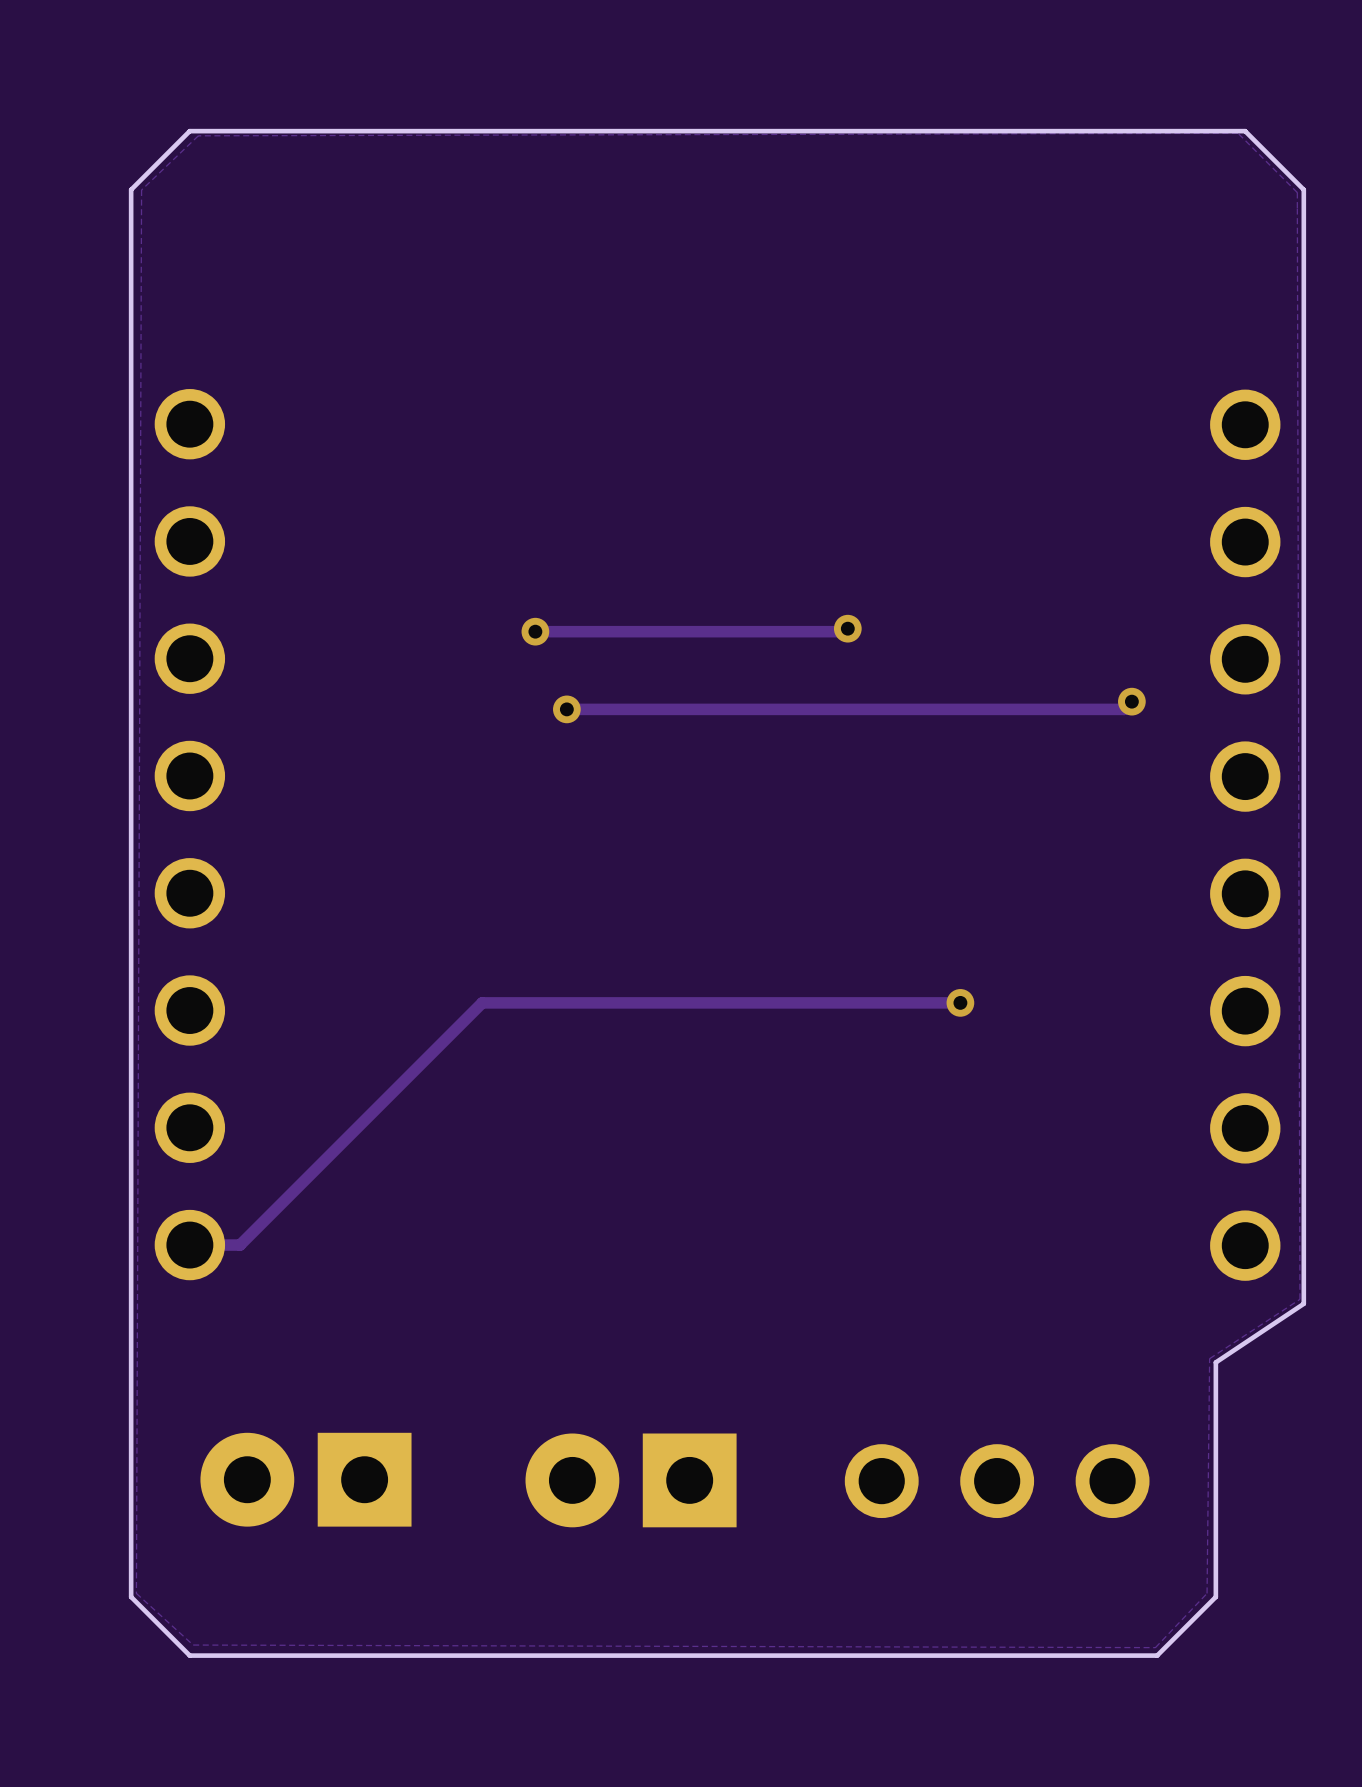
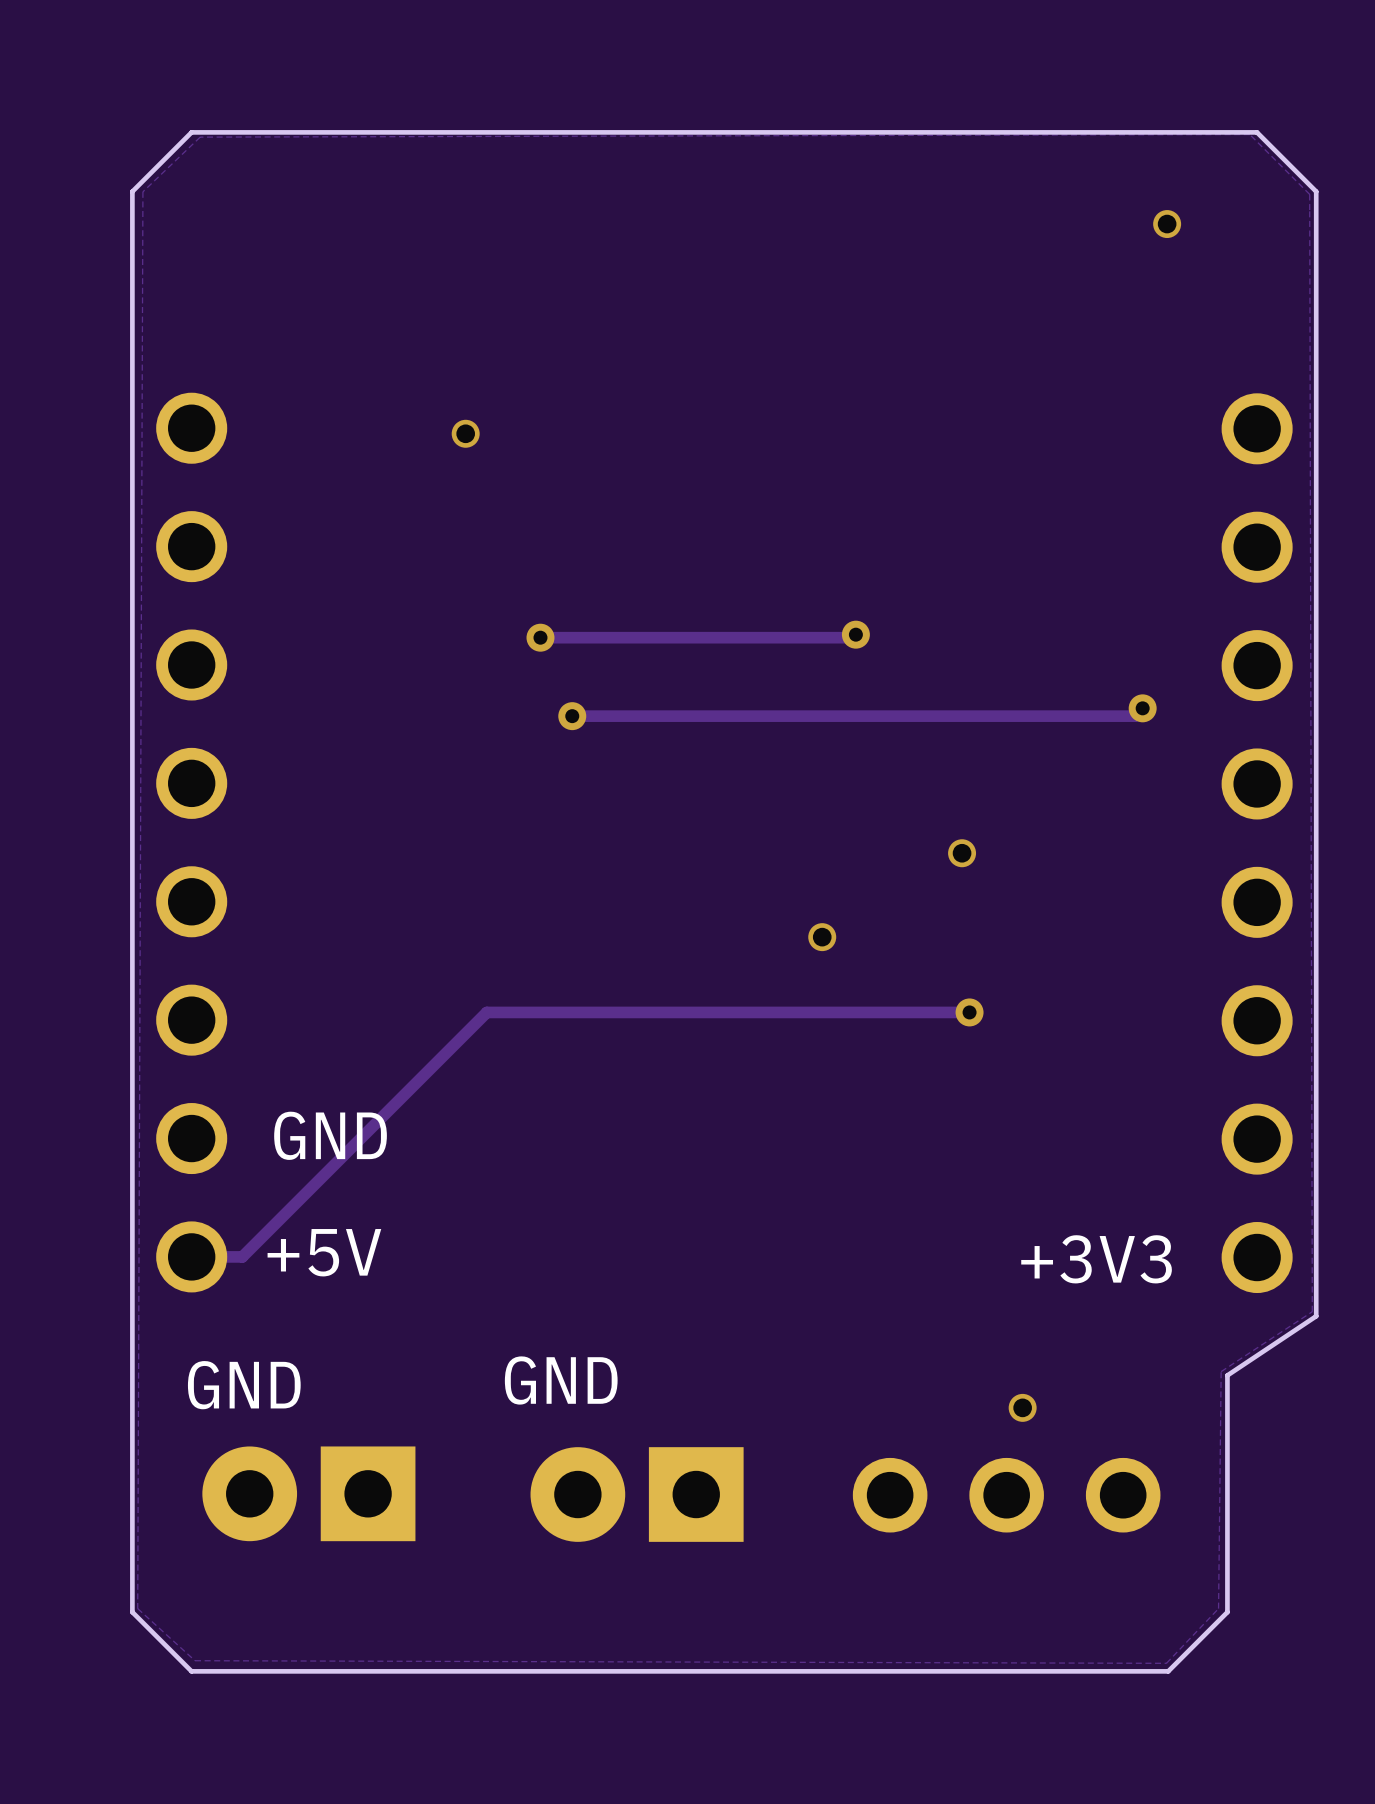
via: none -> (1167, 224)
via: none -> (465, 433)
via: none -> (962, 853)
via: none -> (822, 937)
text: none -> GND (330, 1135)
text: none -> +5V (324, 1252)
text: none -> +3V3 (1096, 1259)
text: none -> GND (561, 1380)
text: none -> GND (244, 1385)
via: none -> (1022, 1407)

